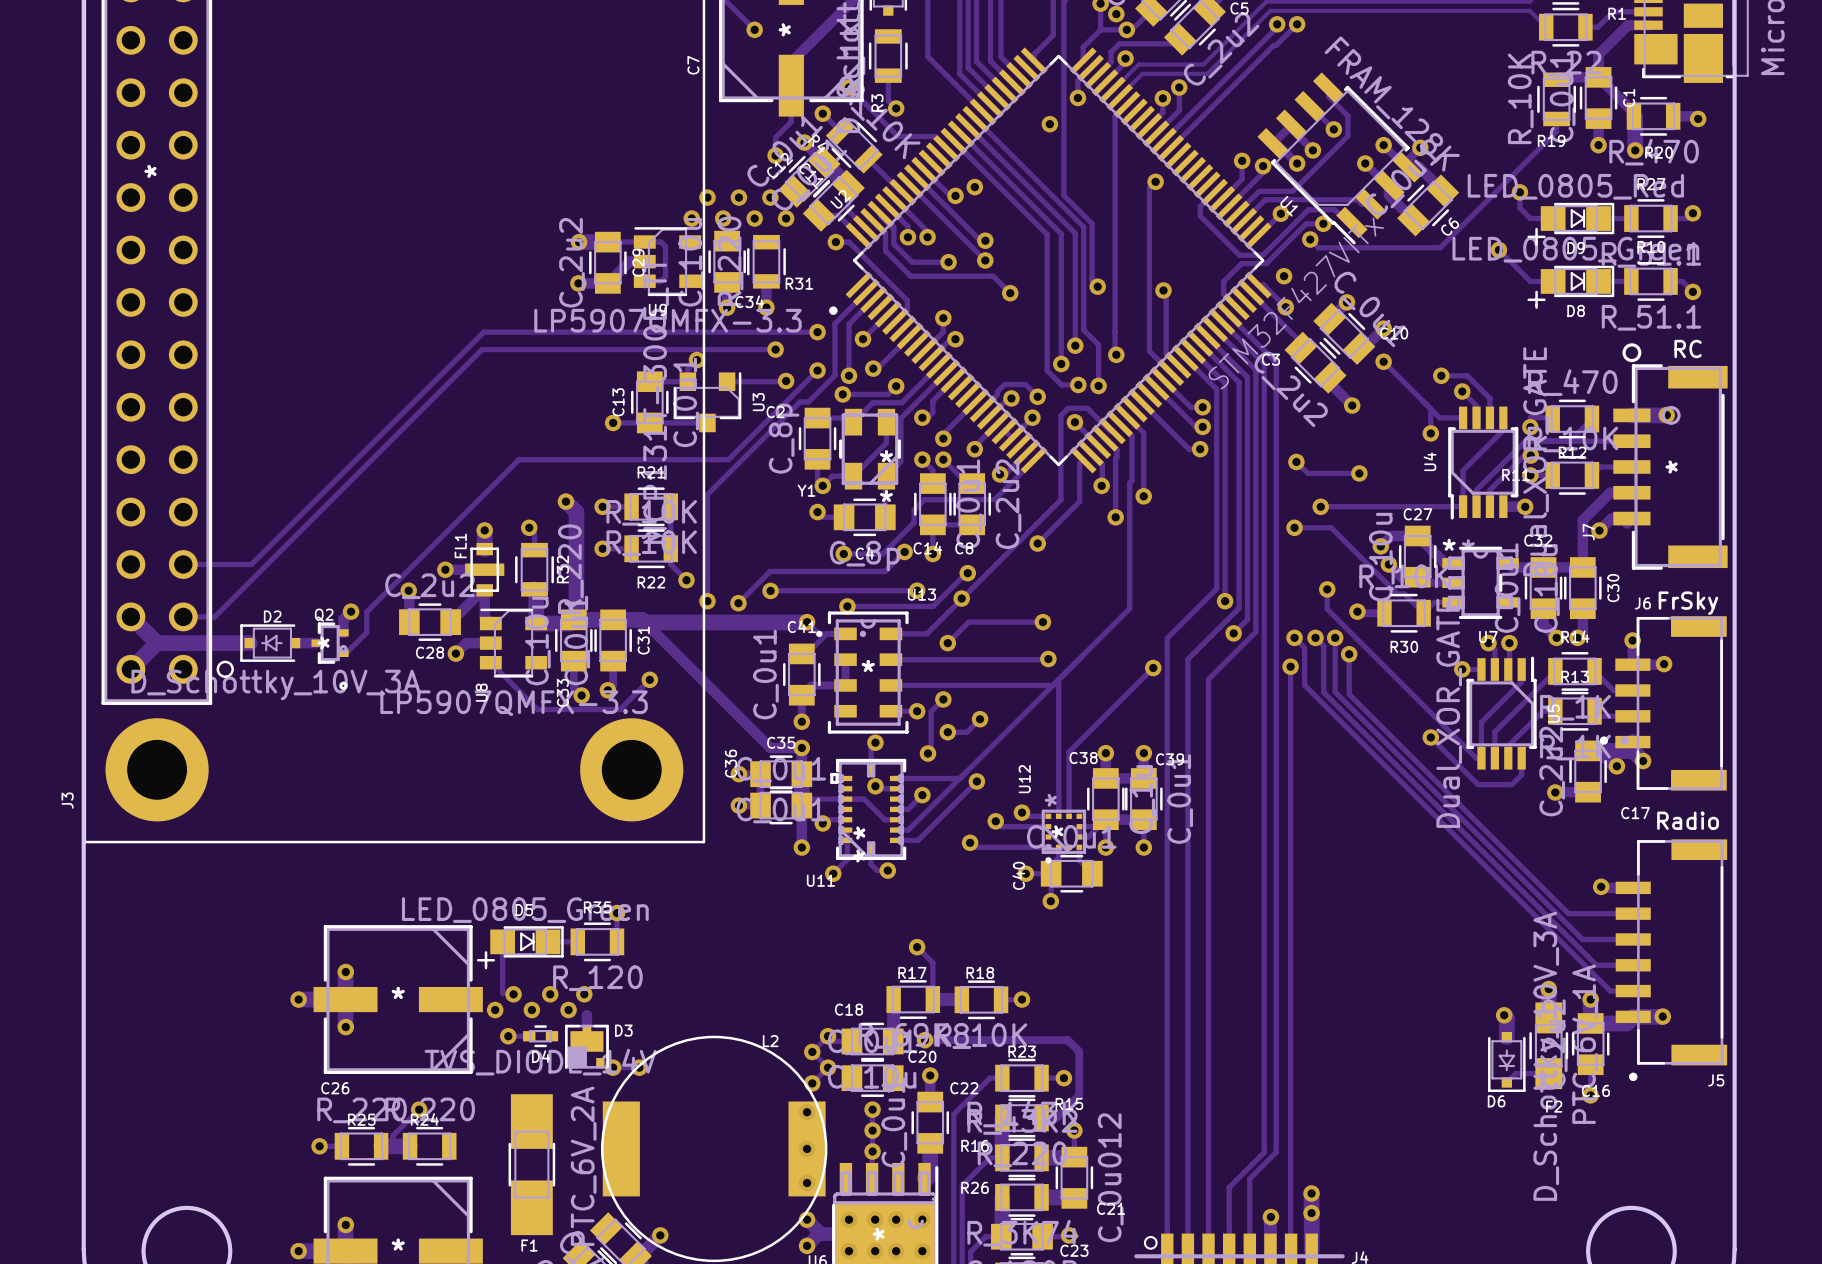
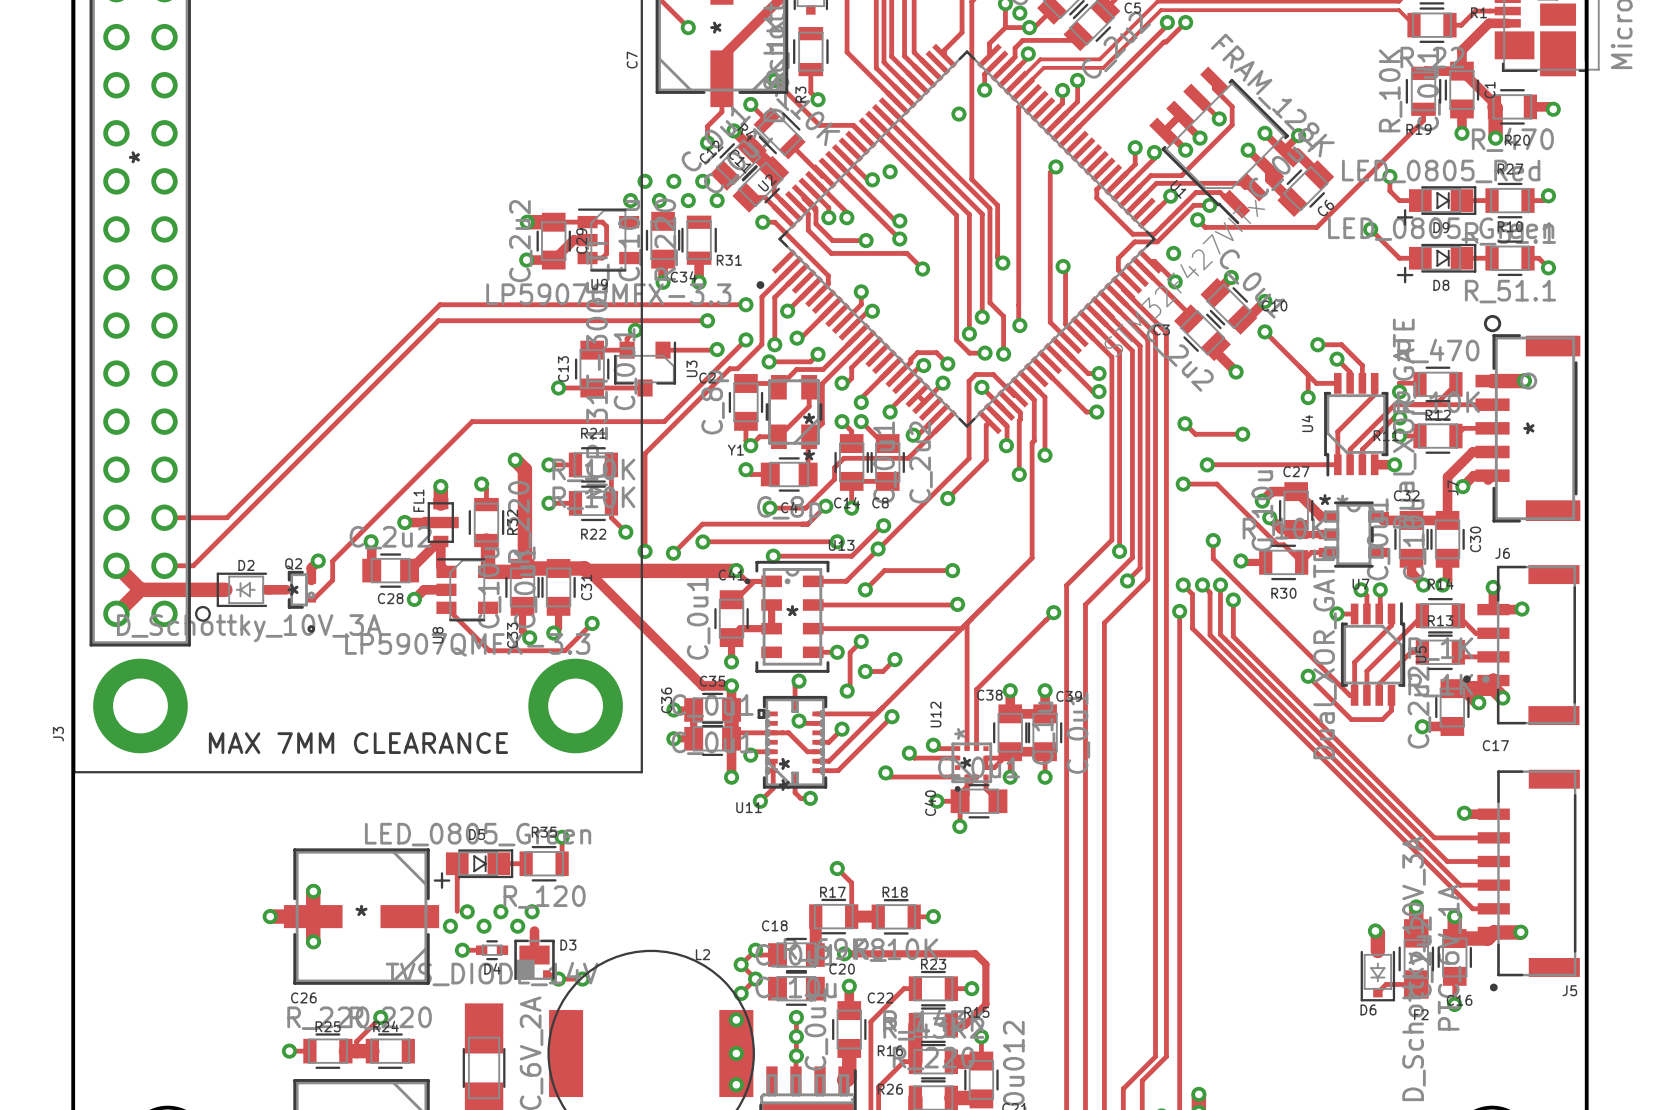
text: RC (1688, 348) -> none
text: FrSky (1688, 603) -> none
J3 text: none -> MAX 7MM CLEARANCE (358, 743)
text: Radio (1688, 820) -> none

